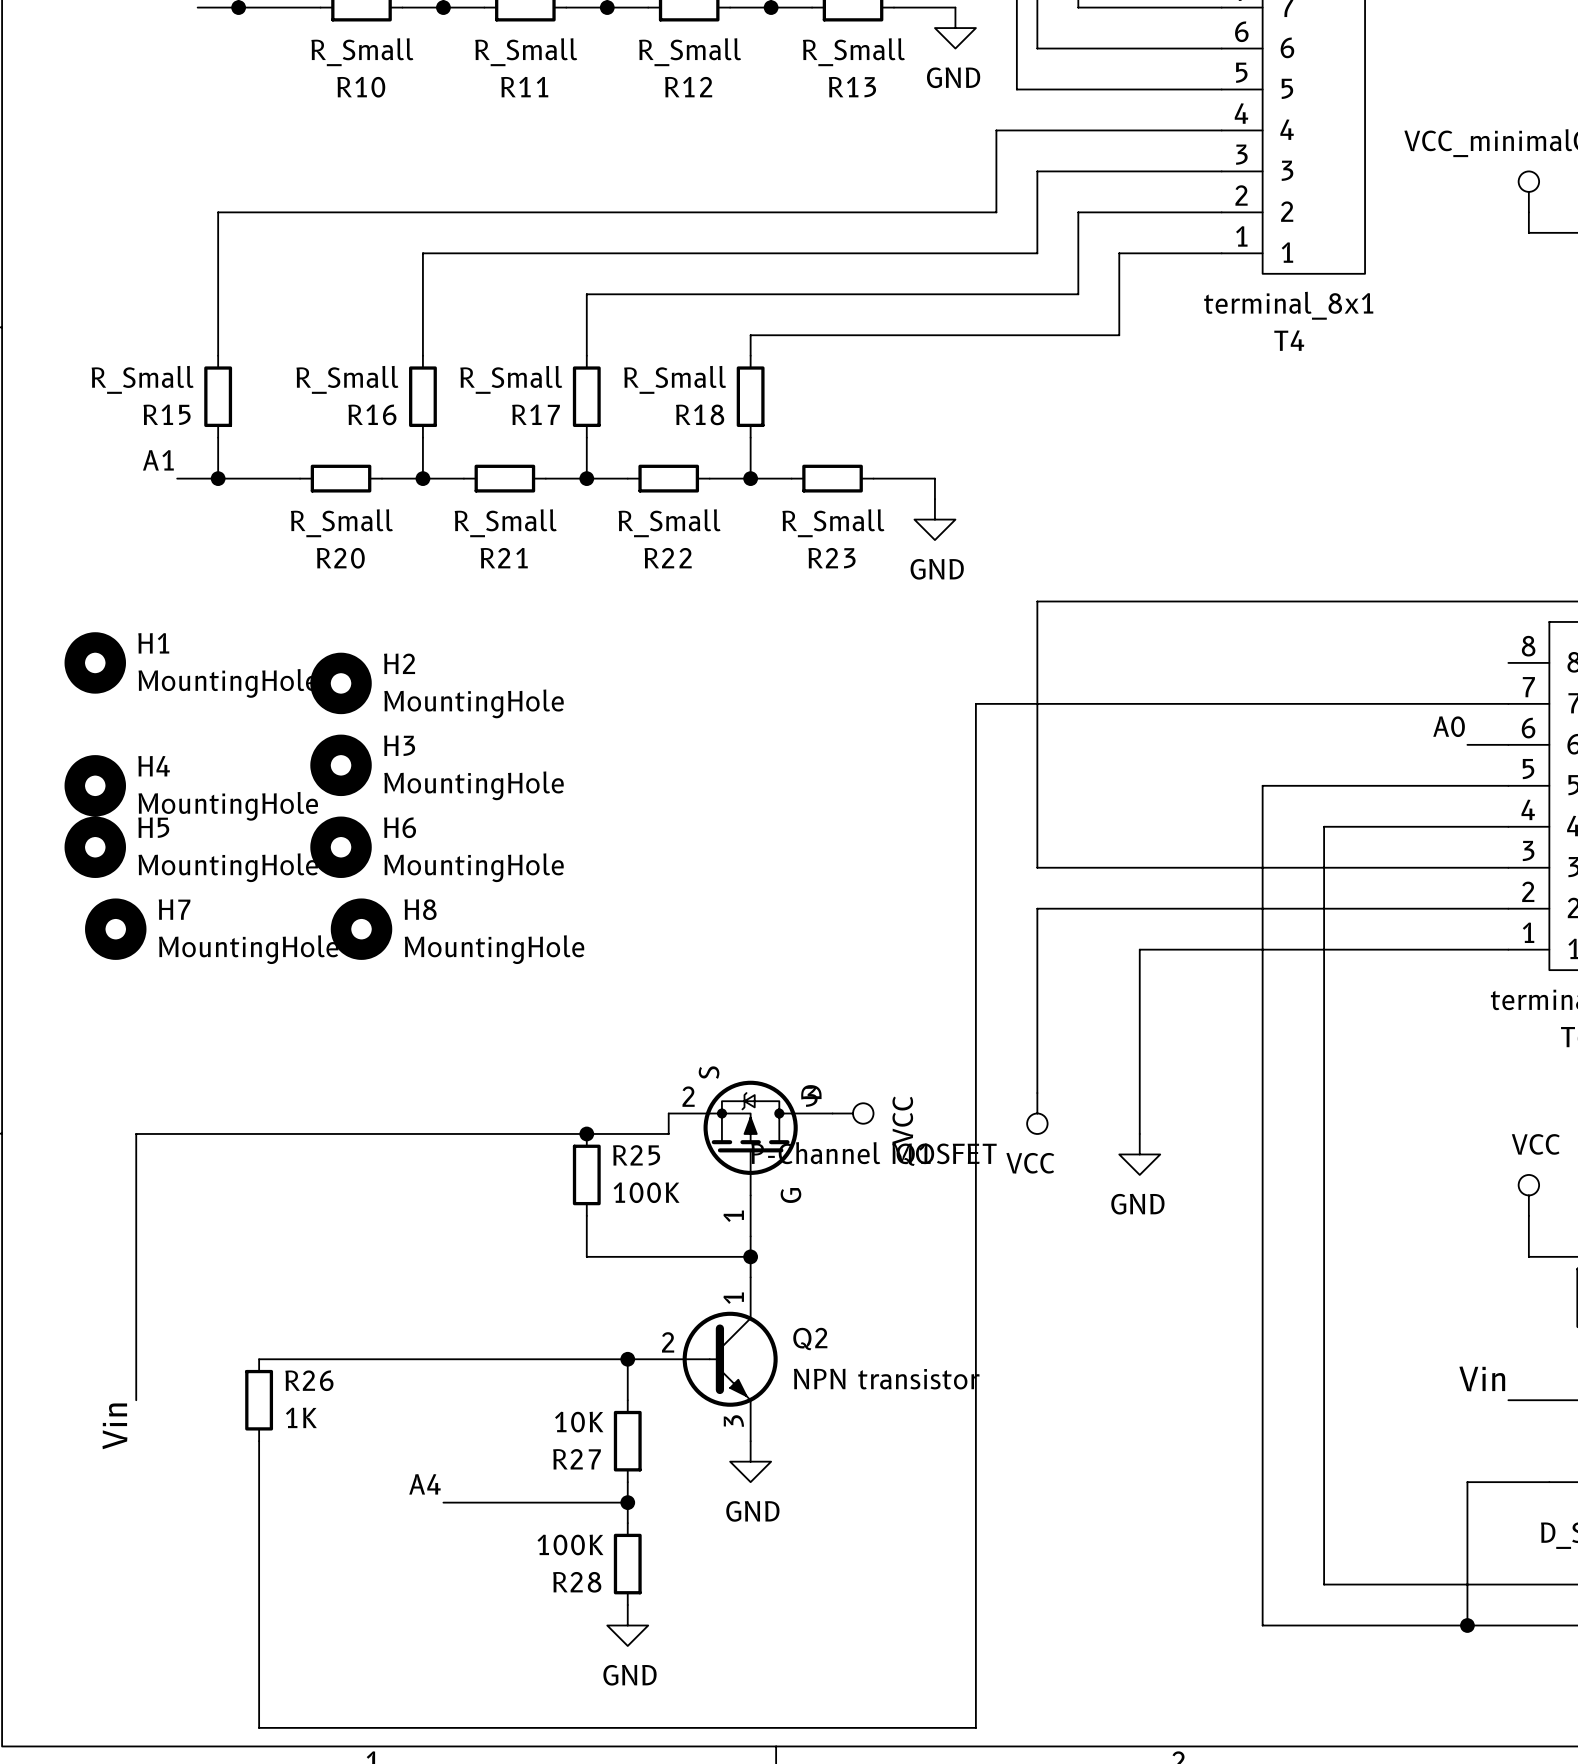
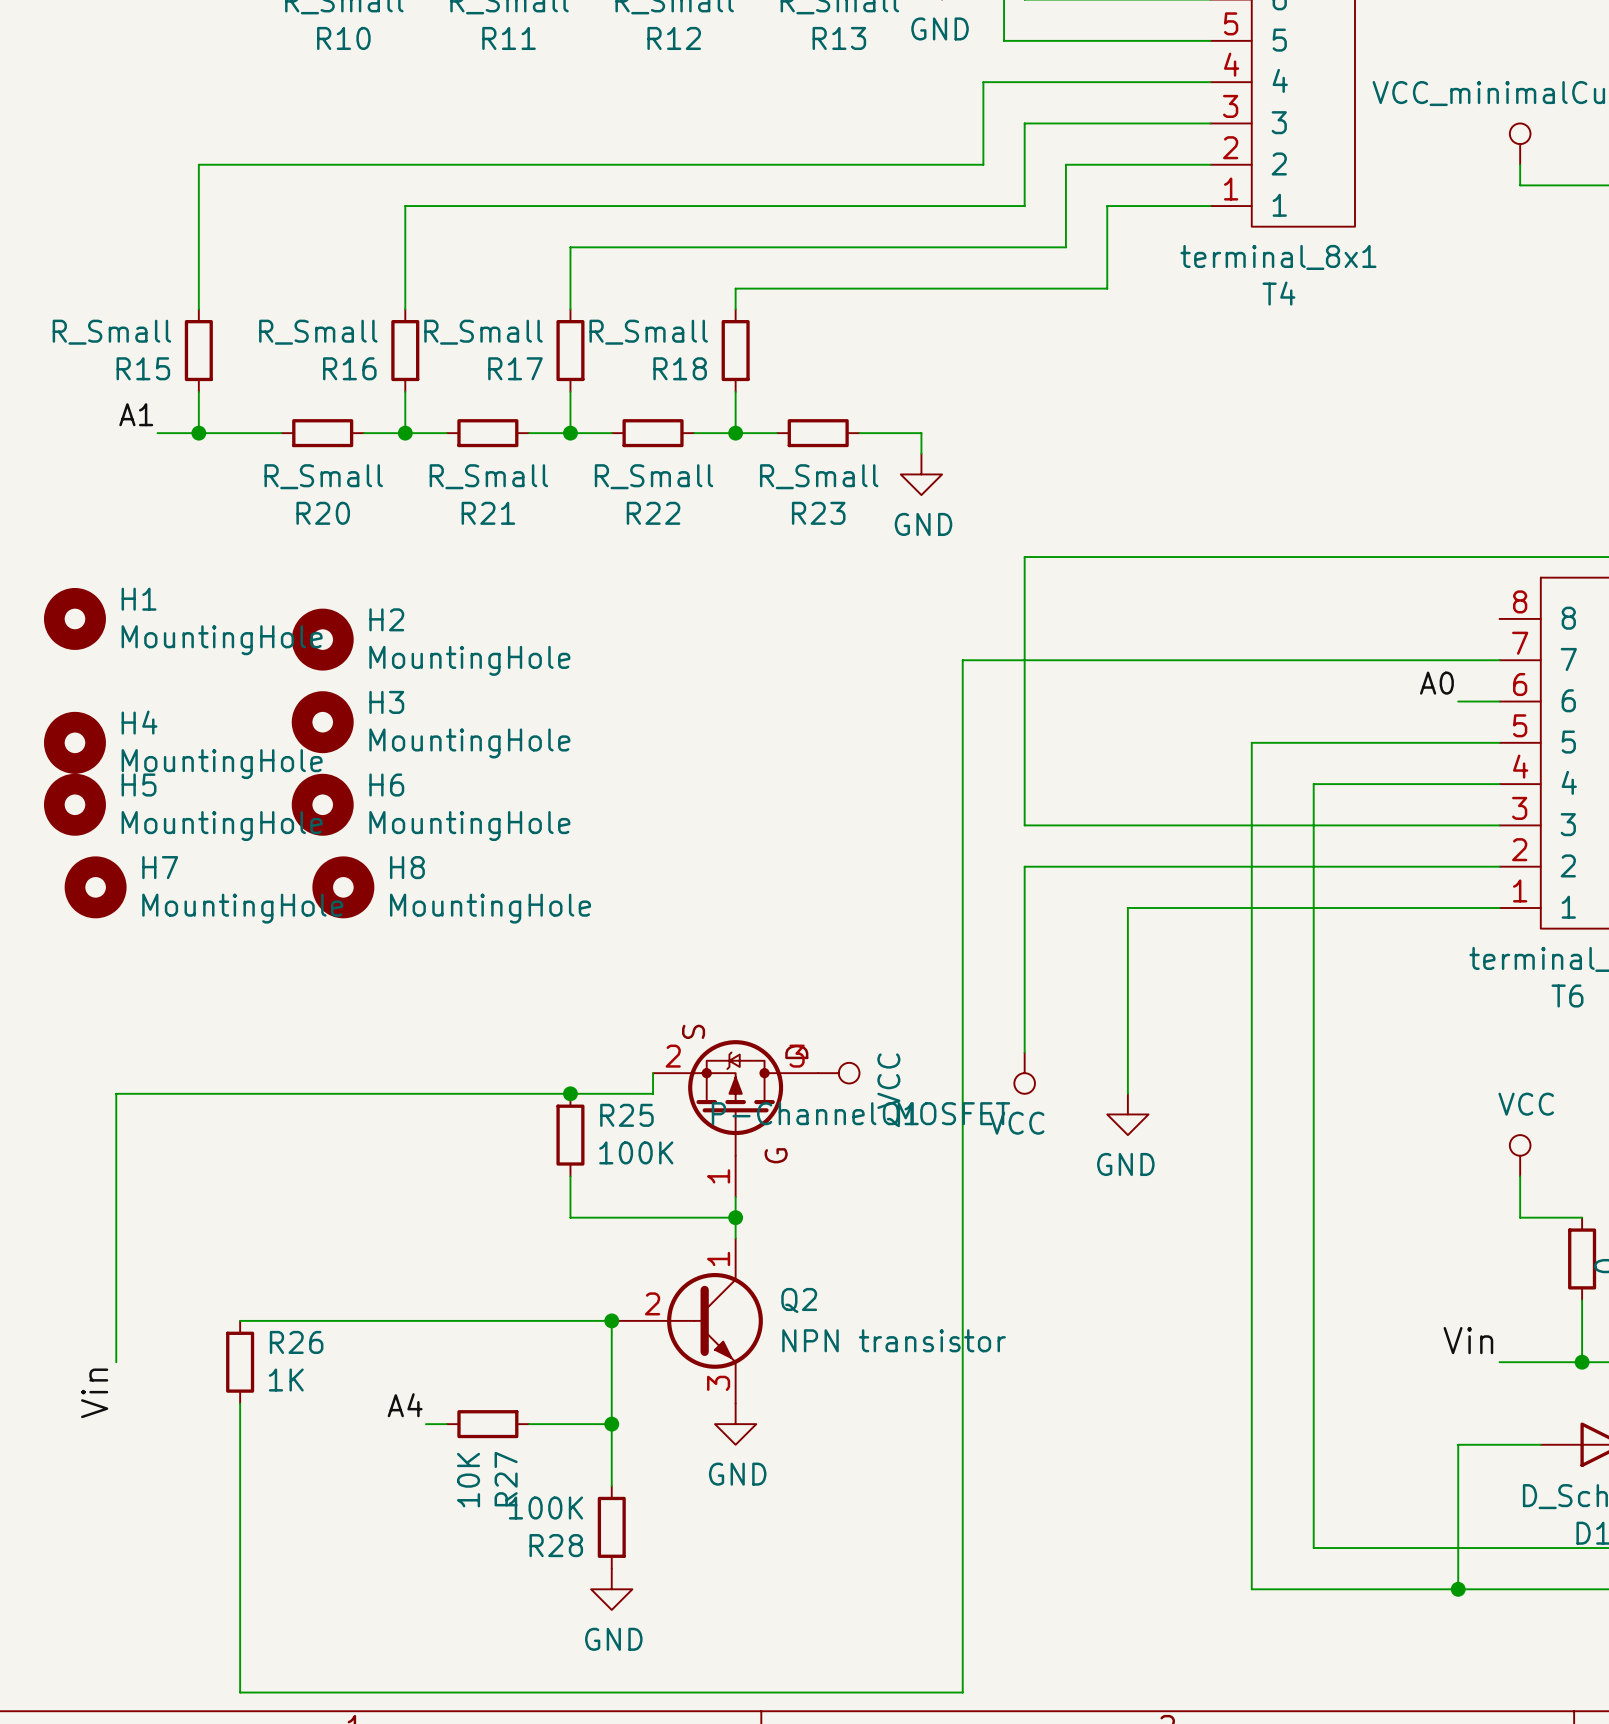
wire: none -> (611, 1362) (611, 1444)
R27 value position: 10K (579, 1422) -> 10K (468, 1480)
R27 rotation: 0° (627, 1441) -> 90° clockwise (487, 1424)
R27 position: (627, 1441) -> (487, 1424)
R27 name position: R27 (577, 1459) -> R27 (506, 1479)
wire: none -> (425, 1424) (446, 1424)
wire: none -> (529, 1424) (611, 1424)
label position: A4 (424, 1484) -> A4 (405, 1405)
wire: (443, 1502) (627, 1502) -> none
junction position: (627, 1502) -> (611, 1424)

